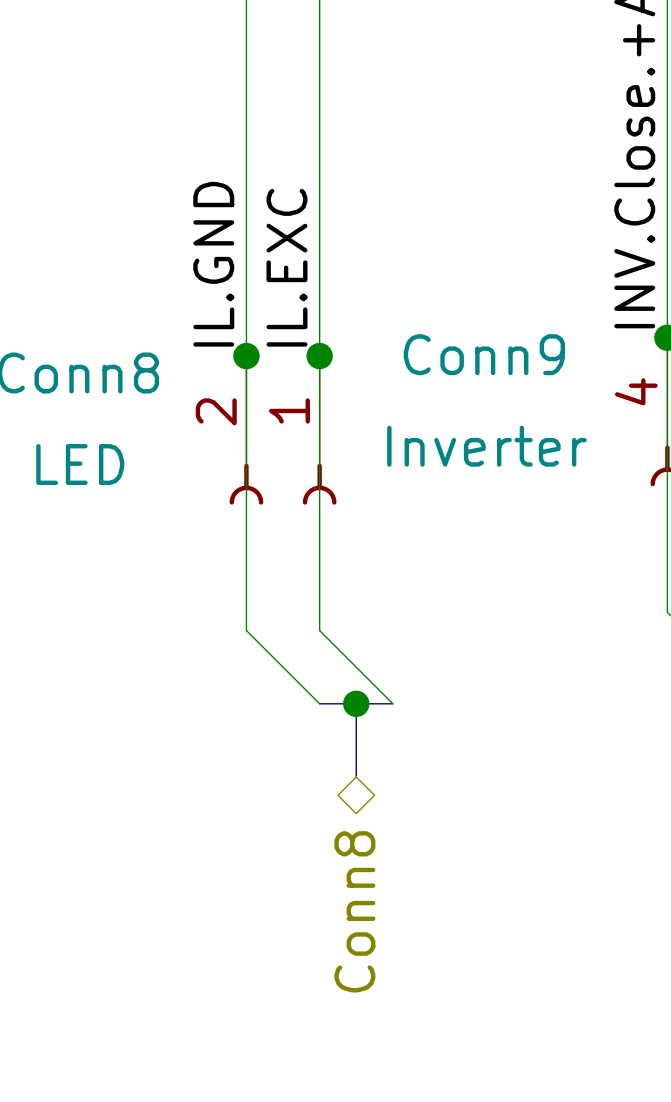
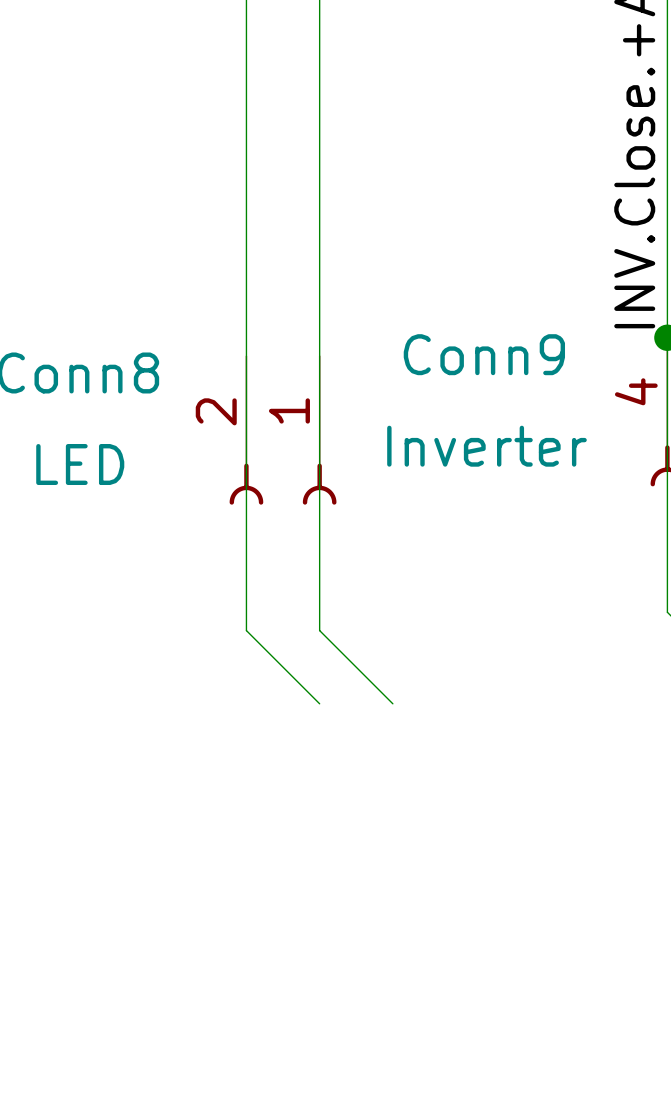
label: IL.GND (213, 264) -> none
label: IL.EXC (286, 267) -> none
junction: (246, 356) -> none
junction: (319, 356) -> none
bus: (319, 703) (392, 703) -> none
bus: (356, 703) (356, 777) -> none
junction: (356, 703) -> none
hierarchical label: Conn8 (354, 911) -> none

